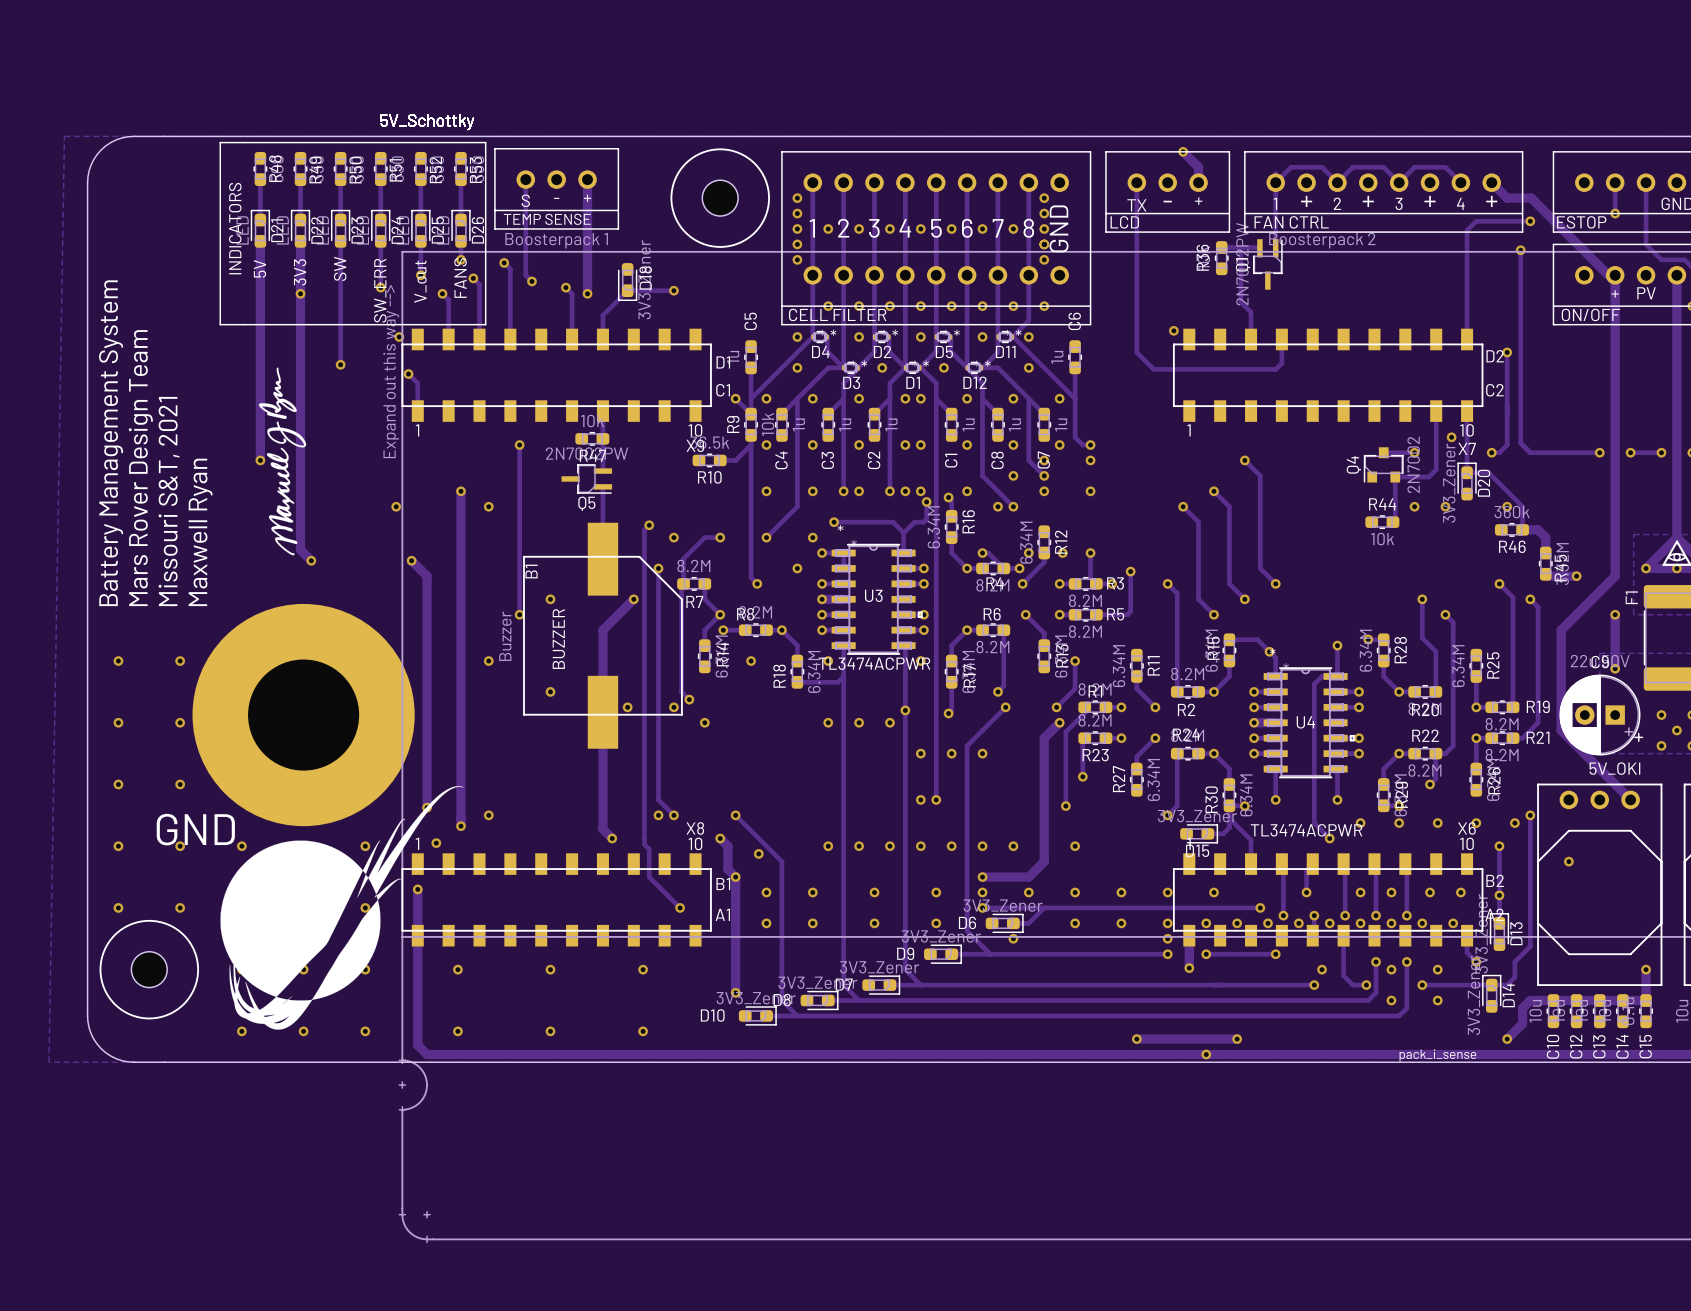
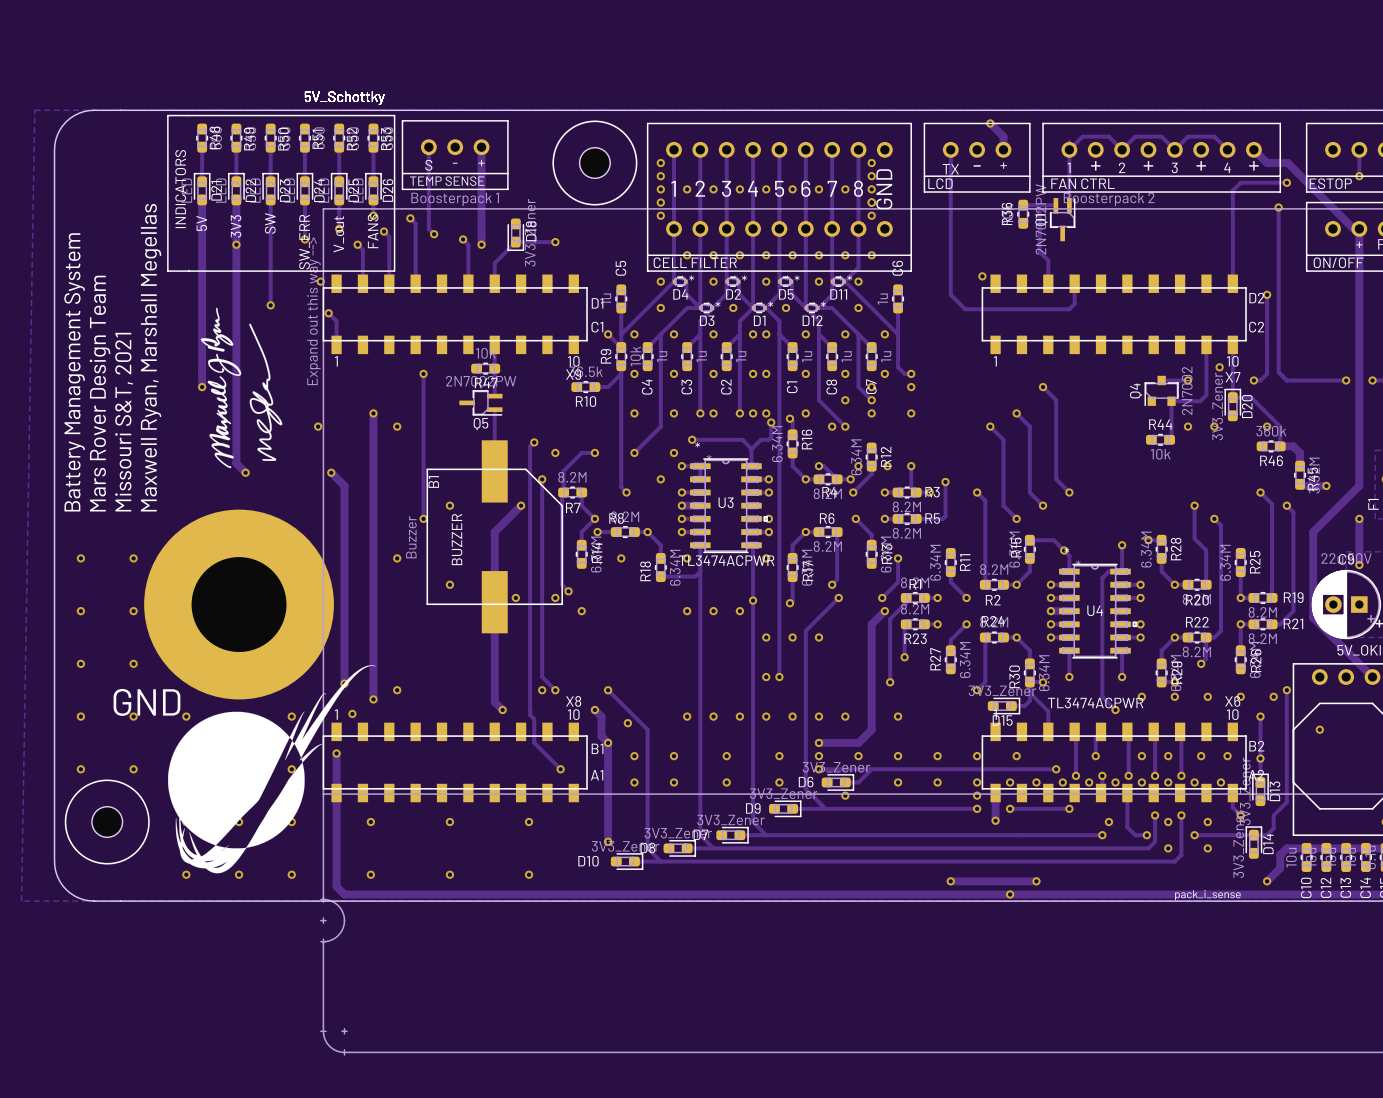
drawing: none -> [249, 323, 283, 461]
text: Maxwell Ryan (200, 532) -> Maxwell Ryan, Marshall Megellas (151, 357)

